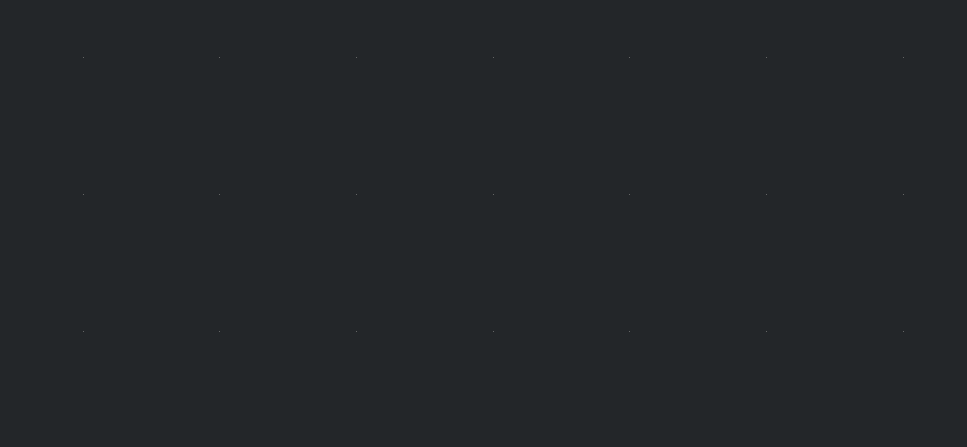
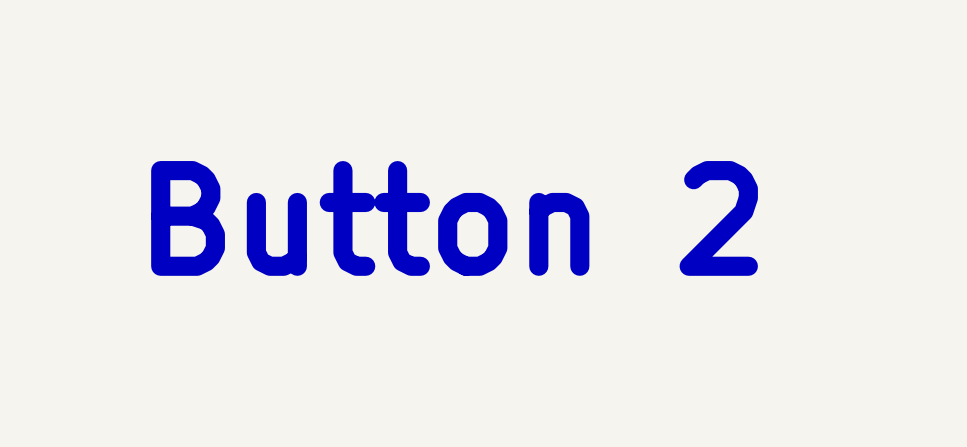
text: none -> Button 2 (454, 218)

